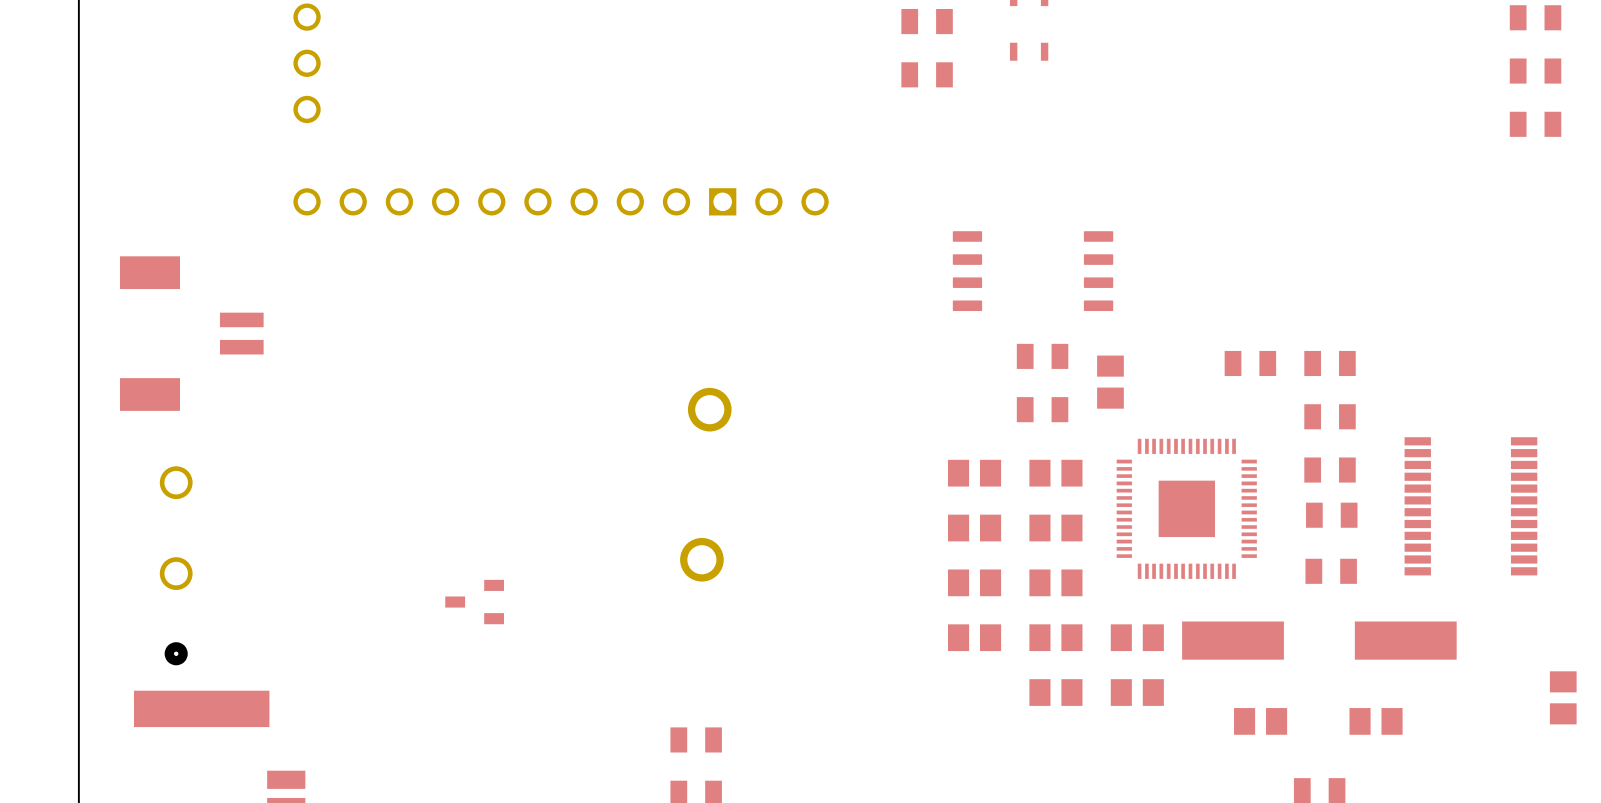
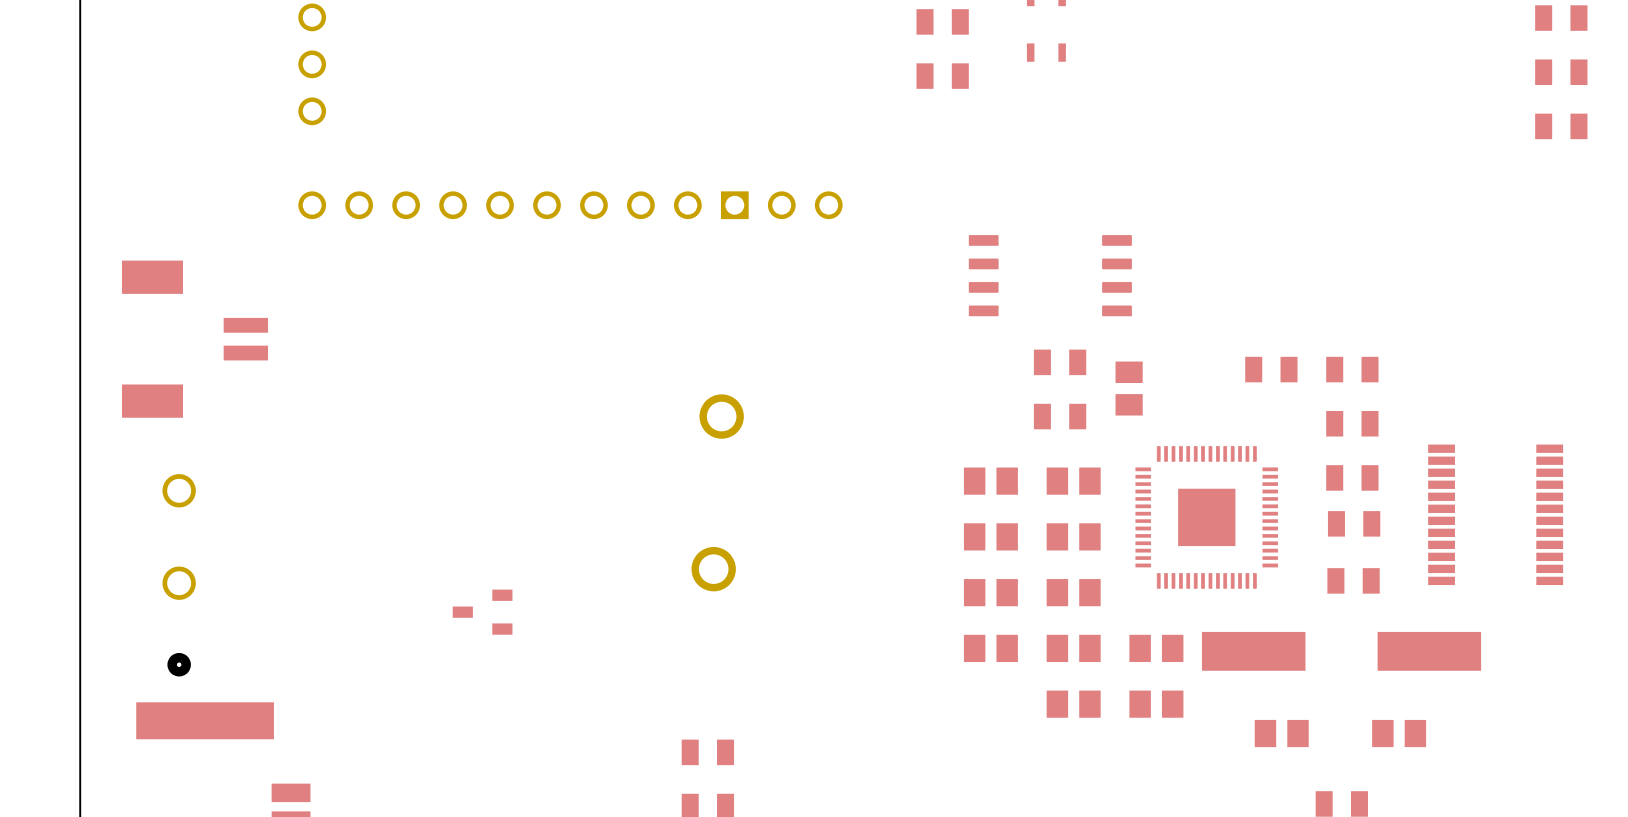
part: (1563, 697) -> none

